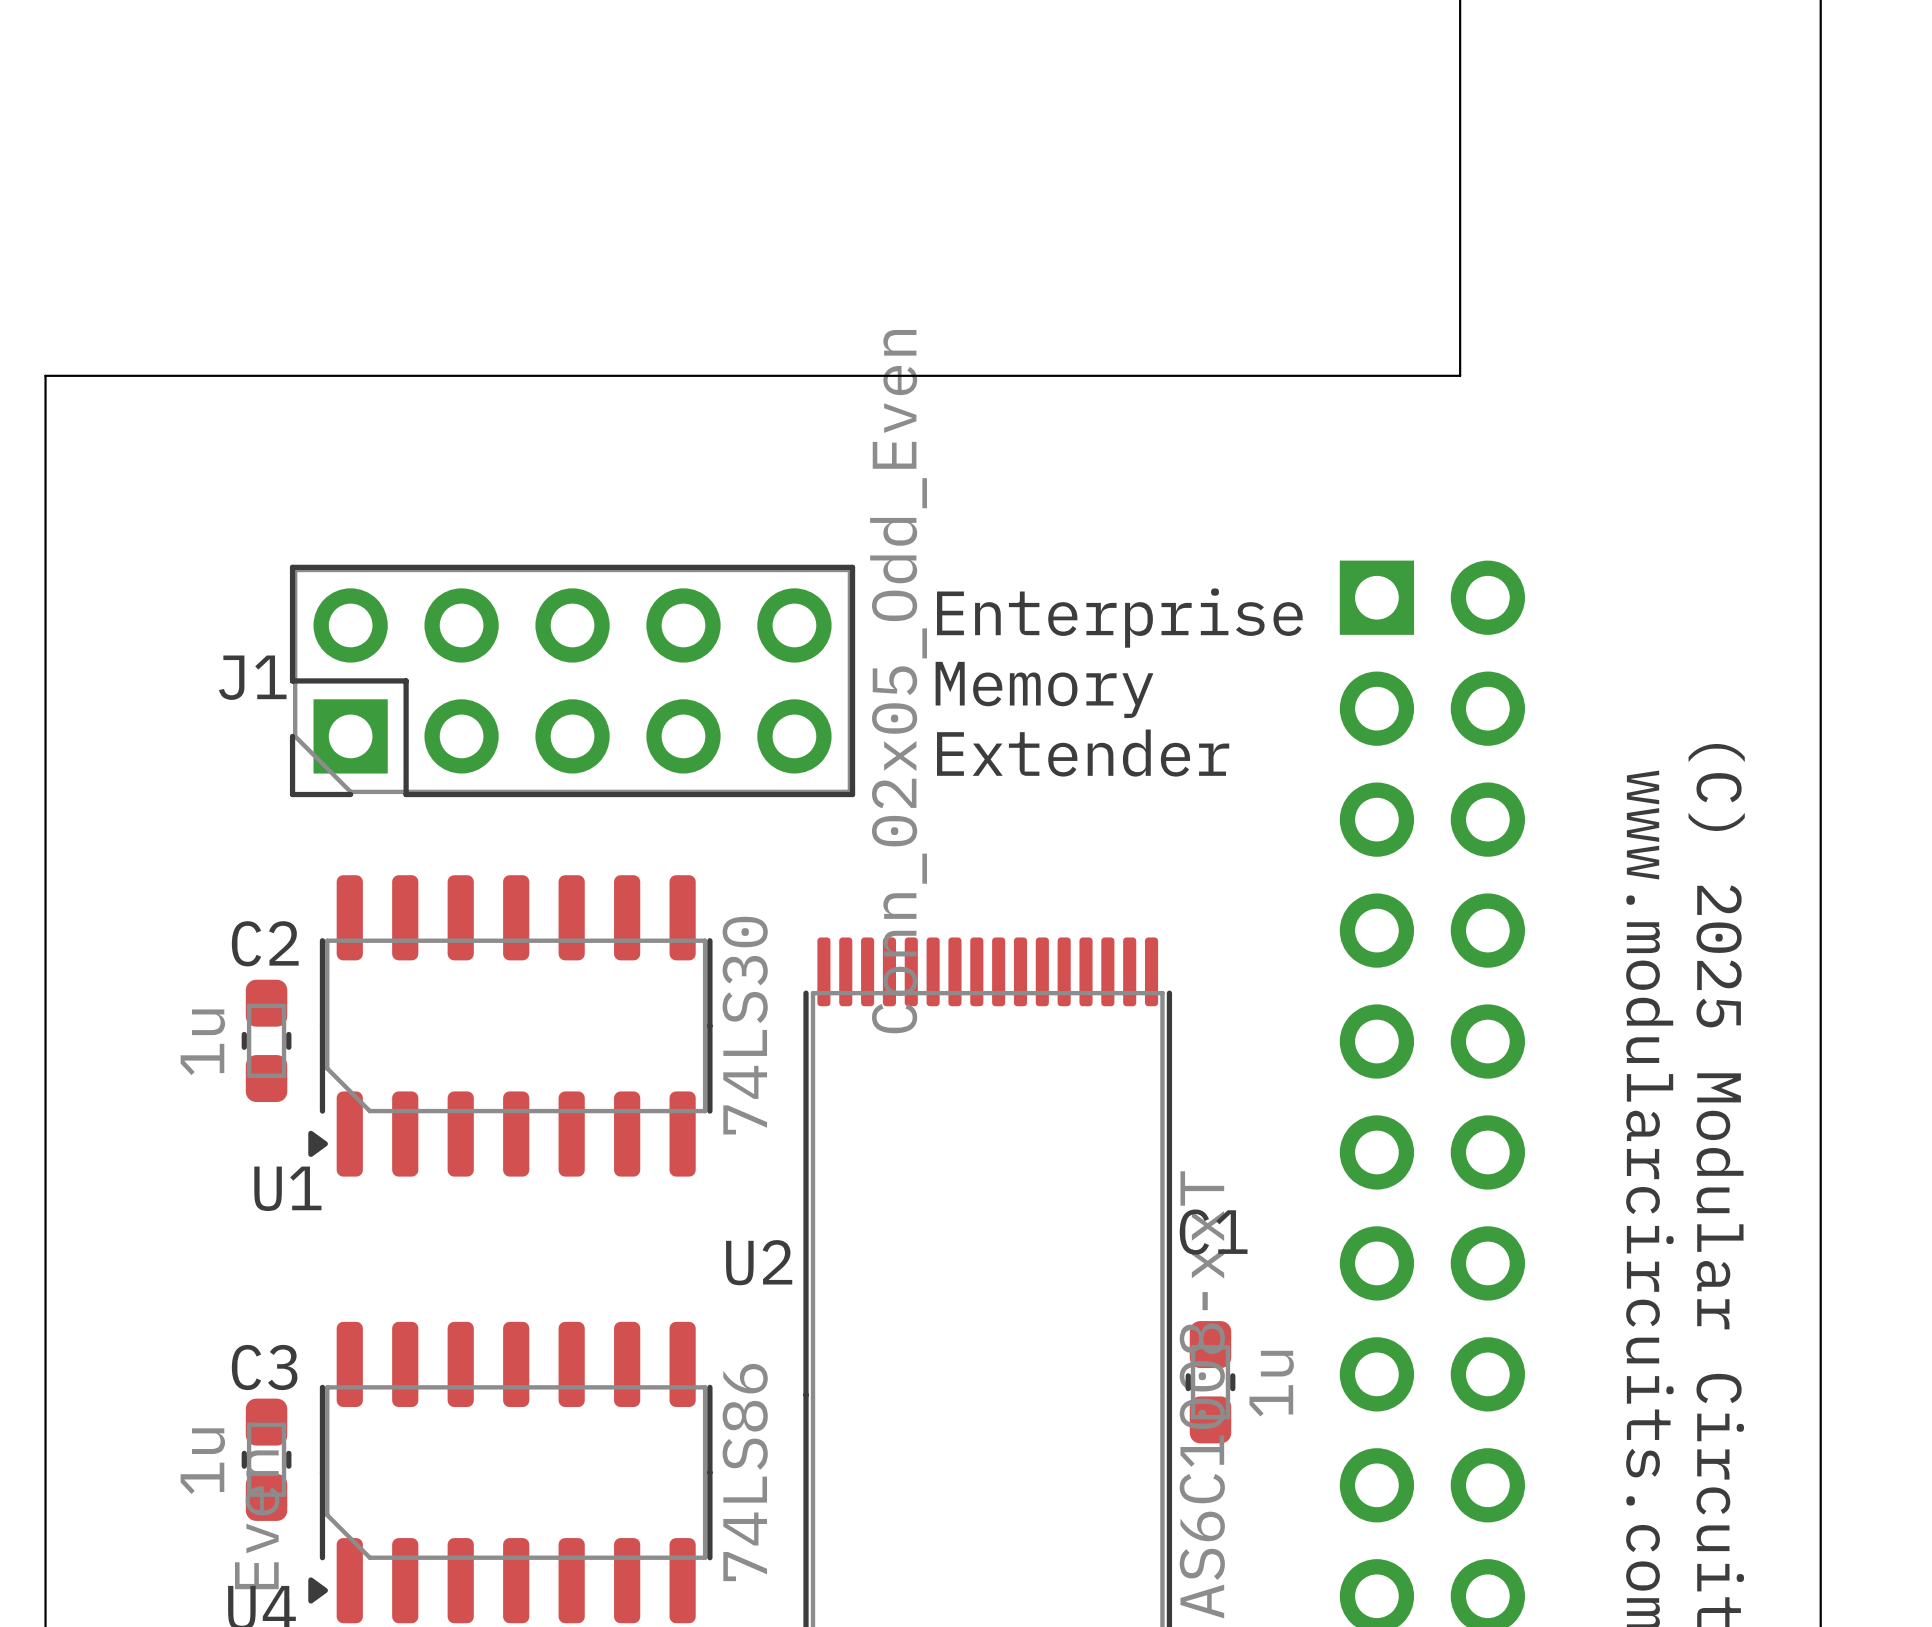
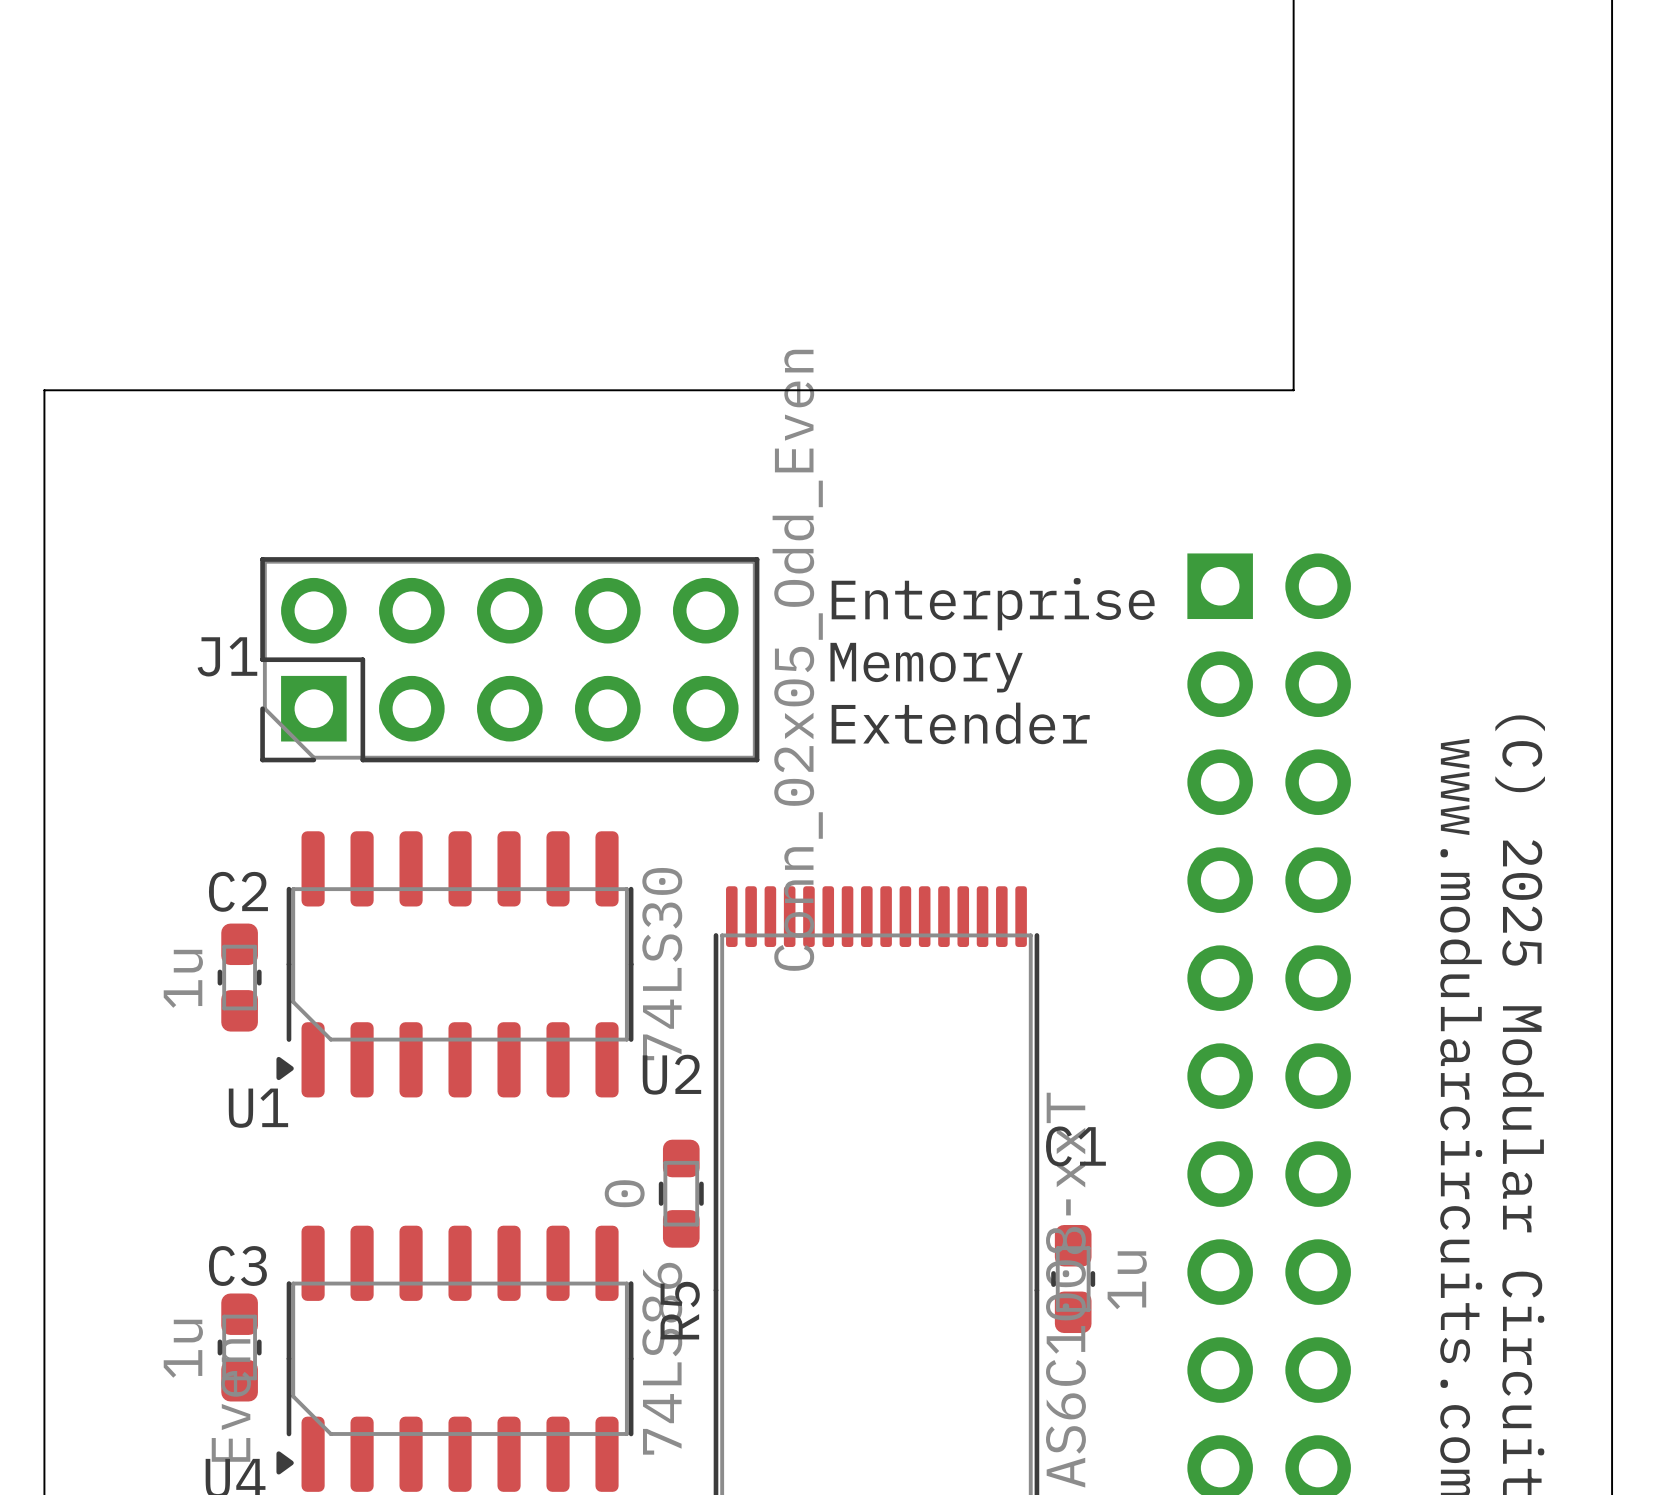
U2 name position: U2 (759, 1262) -> U2 (671, 1074)
R5: none -> 0 (681, 1193)

